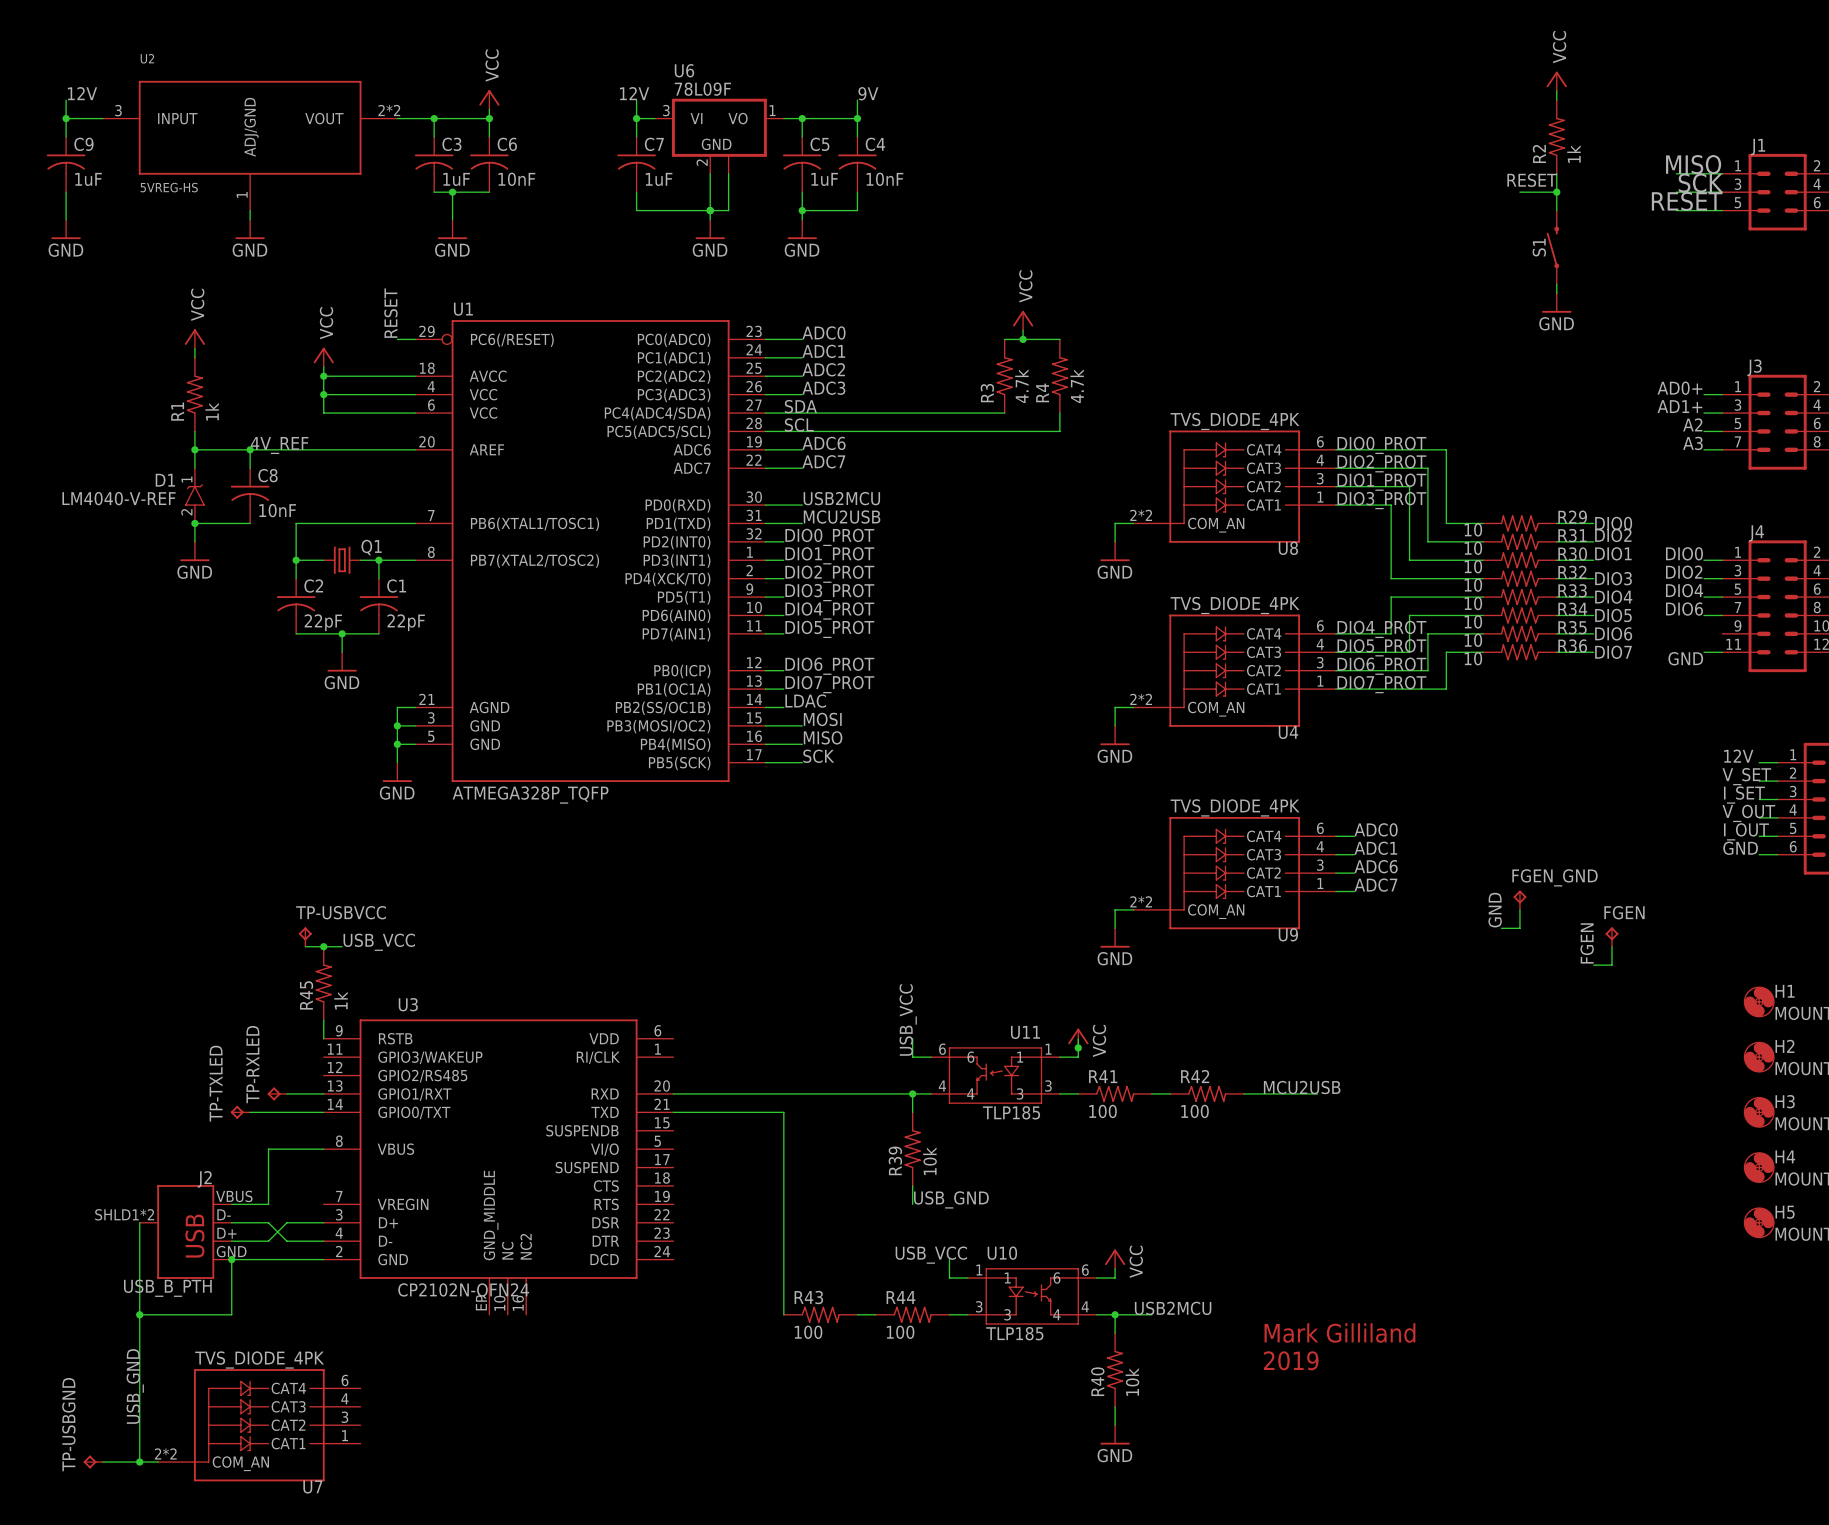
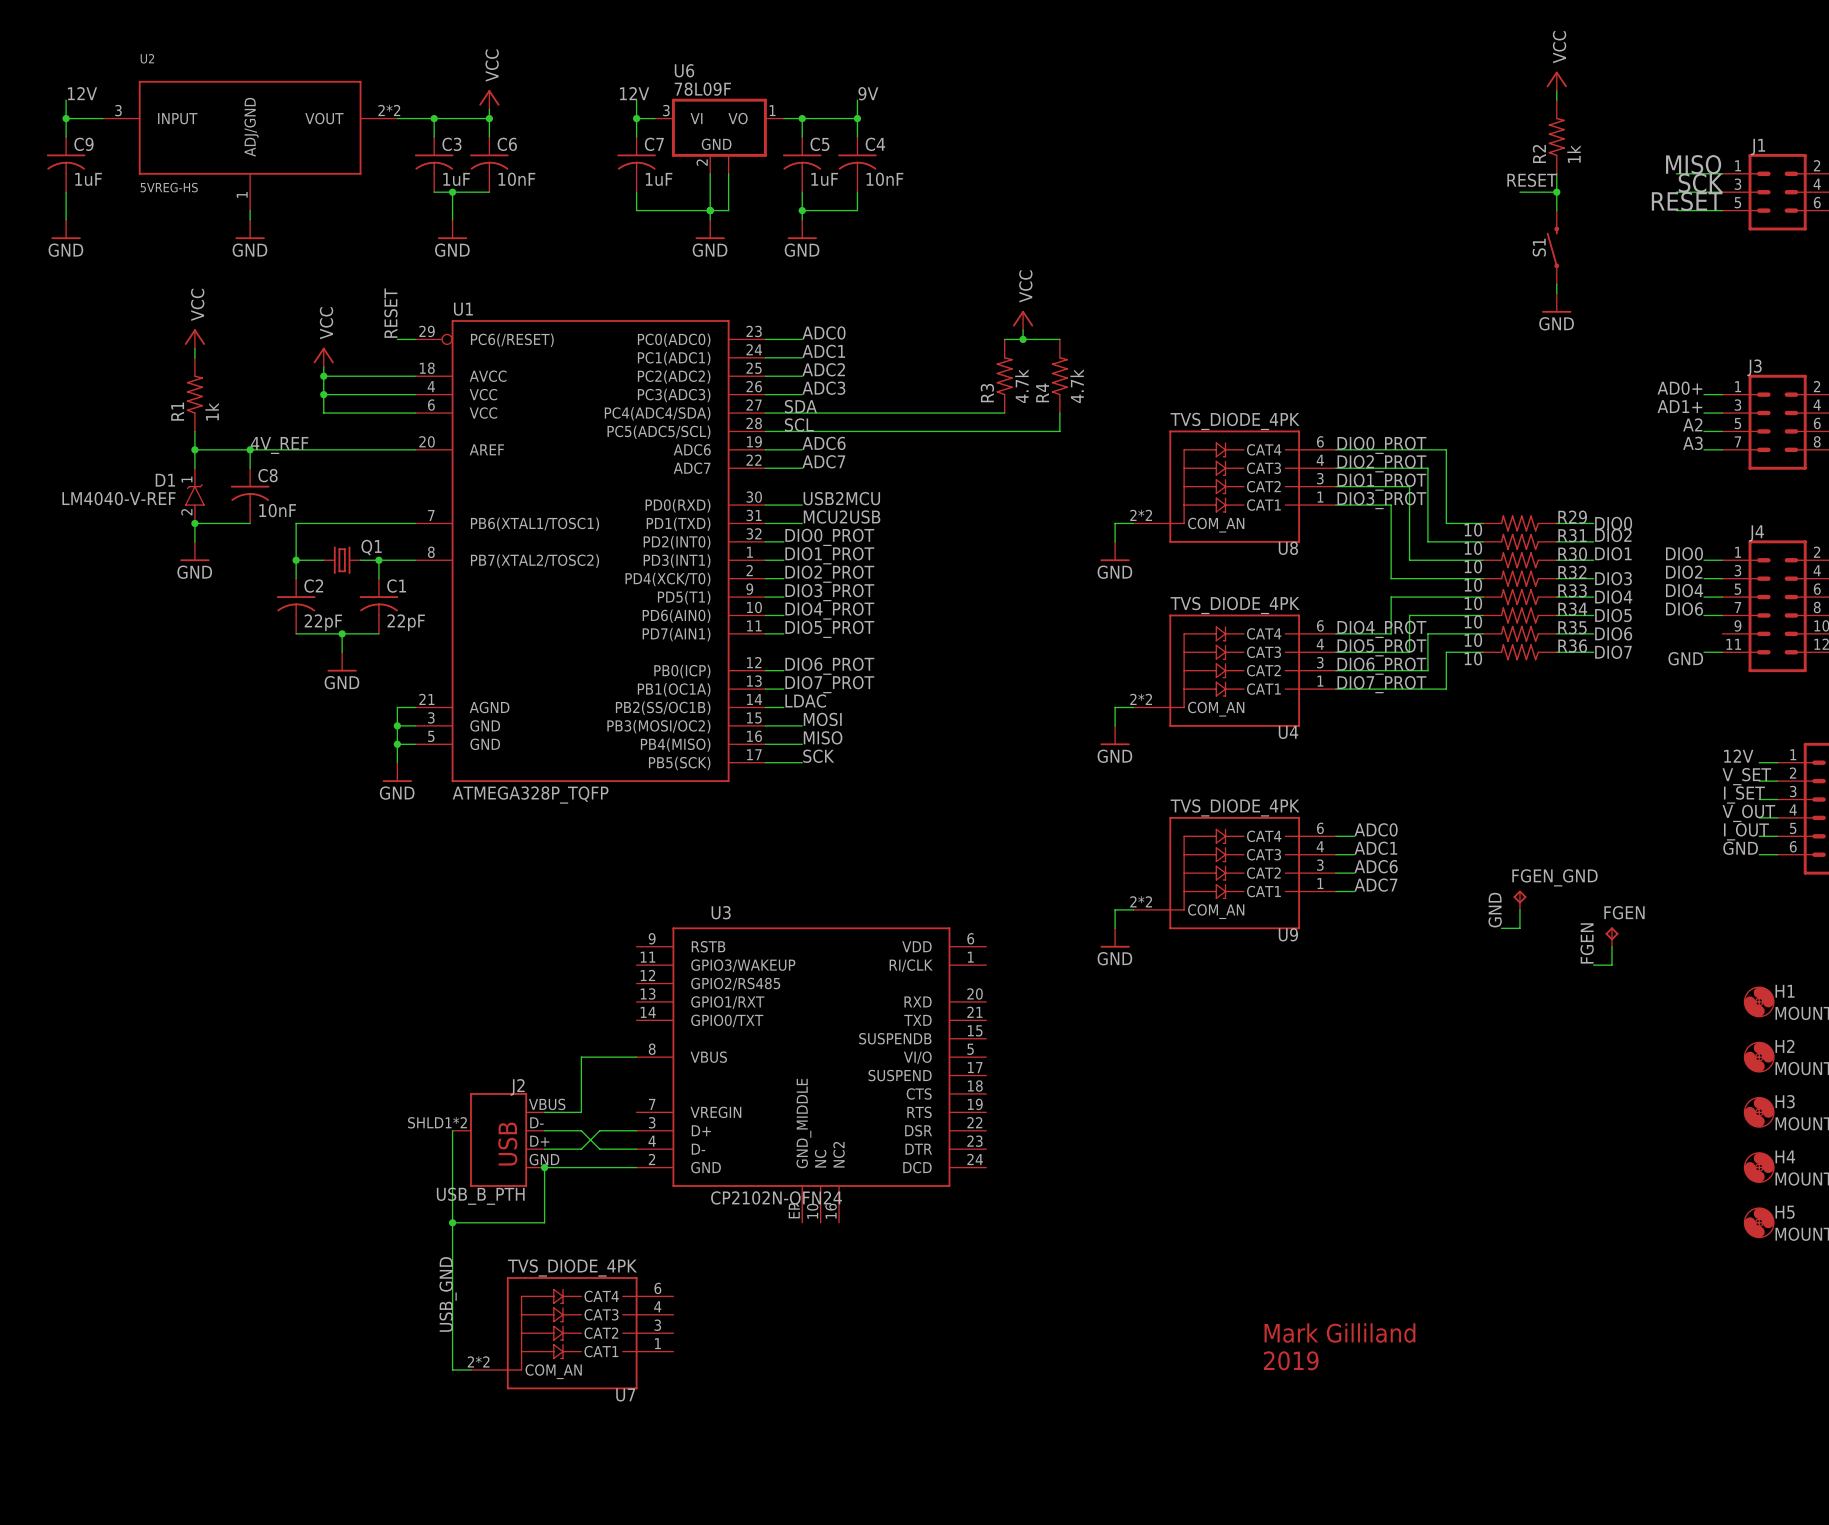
TP-USBVCC: (305, 937) -> none
label: USB_VCC (379, 942) -> none
wire: (305, 946) (342, 946) -> none
junction: (323, 946) -> none
R45: 1k (323, 983) -> none
wire: (323, 1020) (323, 1038) -> none
label: USB_VCC (908, 1020) -> none
wire: (912, 1038) (912, 1057) (931, 1057) -> none
wire: (1078, 1038) (1078, 1057) (1059, 1057) -> none
power symbol: VCC (1078, 1038) -> none
junction: (1078, 1047) -> none
wire: none -> (636, 1057) (581, 1057) (581, 1112) (544, 1112)
U11: TLP185 (995, 1075) -> none
label: MCU2USB (1302, 1087) -> none
TP-RXLED: (277, 1093) -> none
wire: (286, 1093) (323, 1093) -> none
wire: (673, 1093) (931, 1093) -> none
wire: (912, 1093) (912, 1112) -> none
junction: (912, 1093) -> none
wire: (1059, 1093) (1078, 1093) -> none
R41: 100 (1115, 1093) -> none
wire: (1151, 1093) (1170, 1093) -> none
R42: 100 (1207, 1093) -> none
wire: (1243, 1093) (1317, 1093) -> none
TP-TXLED: (240, 1112) -> none
wire: (250, 1112) (323, 1112) -> none
wire: (673, 1112) (783, 1112) (783, 1314) -> none
wire: none -> (452, 1130) (452, 1370) (470, 1370)
wire: none -> (544, 1130) (581, 1130) (599, 1149) (636, 1149)
wire: none -> (636, 1130) (599, 1130) (581, 1149) (544, 1149)
wire: (323, 1149) (268, 1149) (268, 1204) (231, 1204) -> none
R39: 10k (912, 1149) -> none
U3 position: (498, 1167) -> (811, 1075)
junction: none -> (544, 1167)
wire: none -> (636, 1167) (544, 1167) (544, 1222) (452, 1222)
wire: (912, 1185) (912, 1204) -> none
label: USB_GND (951, 1199) -> none
wire: (139, 1222) (139, 1462) -> none
wire: (231, 1222) (268, 1222) (286, 1241) (323, 1241) -> none
wire: (323, 1222) (286, 1222) (268, 1241) (231, 1241) -> none
junction: none -> (452, 1222)
J2 position: (185, 1231) -> (498, 1139)
label: USB_VCC (931, 1255) -> none
junction: (231, 1259) -> none
wire: (323, 1259) (231, 1259) (231, 1314) (139, 1314) -> none
wire: (949, 1259) (949, 1277) (967, 1277) -> none
power symbol: VCC (1115, 1259) -> none
wire: (1115, 1268) (1115, 1277) (1096, 1277) -> none
label: none -> USB_GND (448, 1294)
U10: TLP185 (1032, 1296) -> none
label: USB2MCU (1173, 1308) -> none
junction: (139, 1314) -> none
R43: 100 (820, 1314) -> none
wire: (857, 1314) (875, 1314) -> none
R44: 100 (912, 1314) -> none
wire: (949, 1314) (967, 1314) -> none
wire: (1096, 1314) (1151, 1314) -> none
wire: (1115, 1314) (1115, 1333) -> none
junction: (1115, 1314) -> none
R40: 10k (1115, 1370) -> none
label: USB_GND (135, 1386) -> none
wire: (1115, 1406) (1115, 1425) -> none
U7 position: (259, 1425) -> (572, 1333)
power symbol: GND (1115, 1434) -> none
TP-USBGND: (93, 1462) -> none
wire: (102, 1462) (158, 1462) -> none
junction: (139, 1462) -> none

